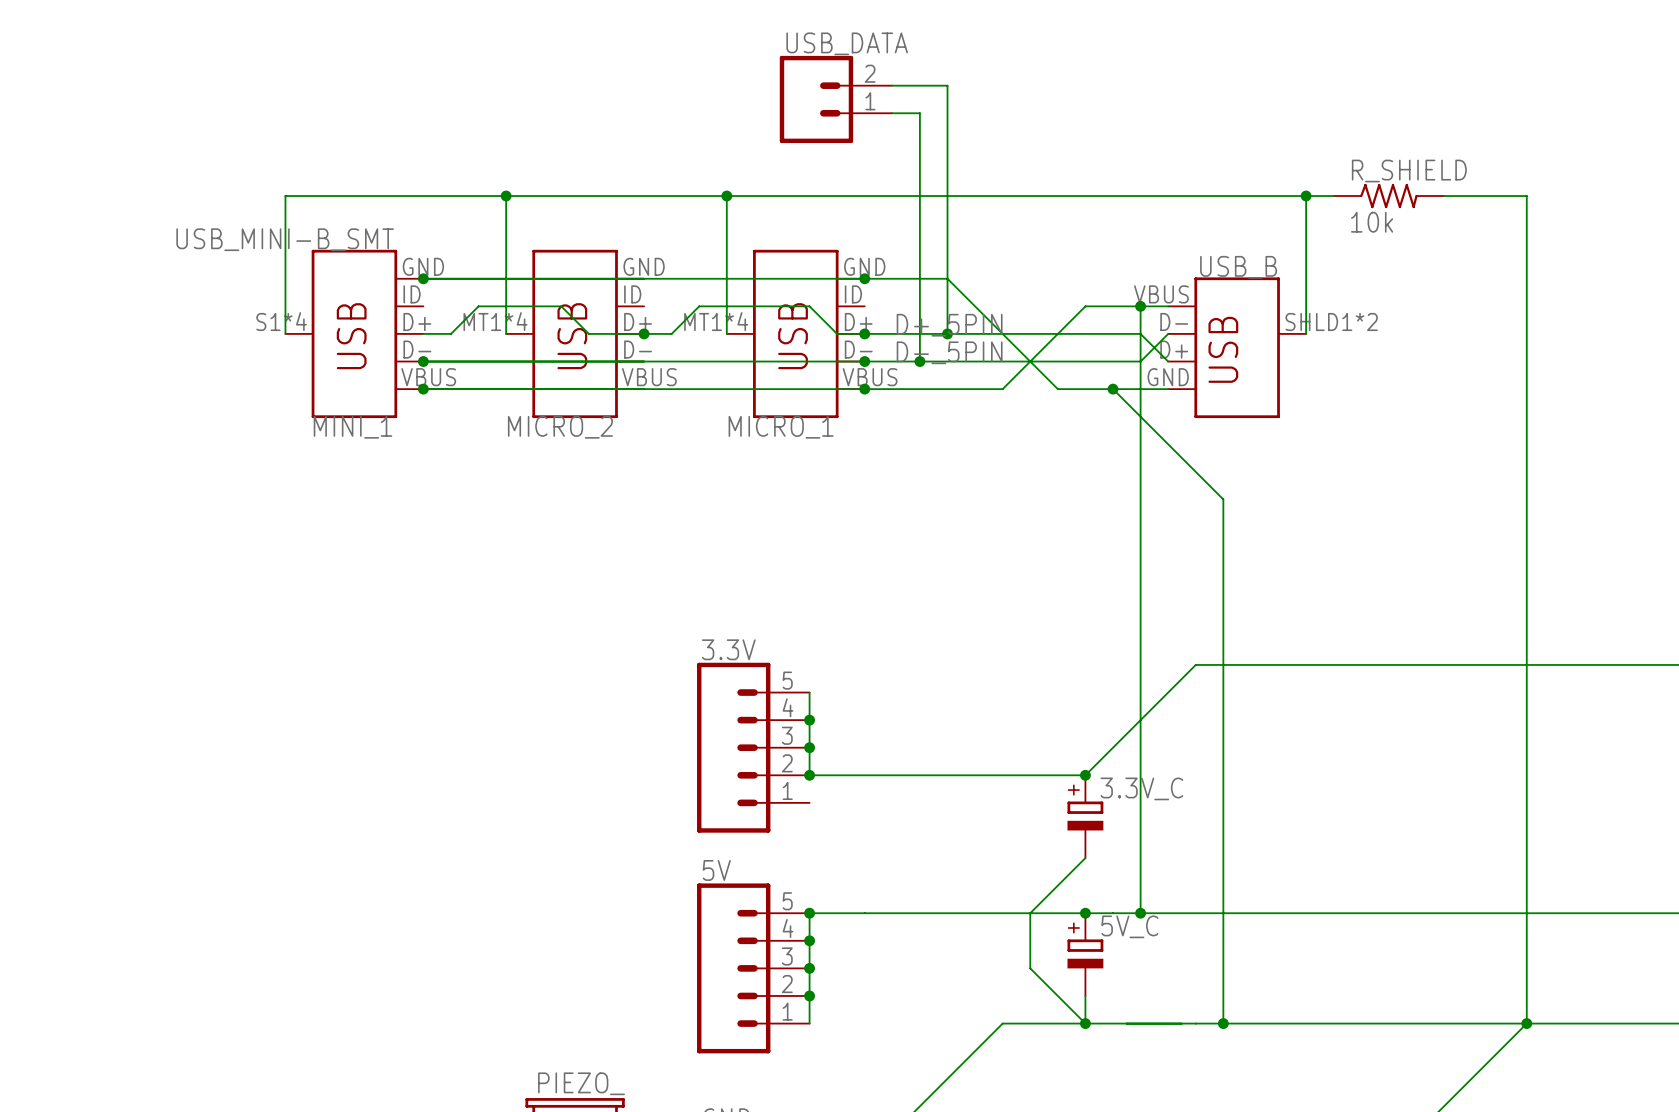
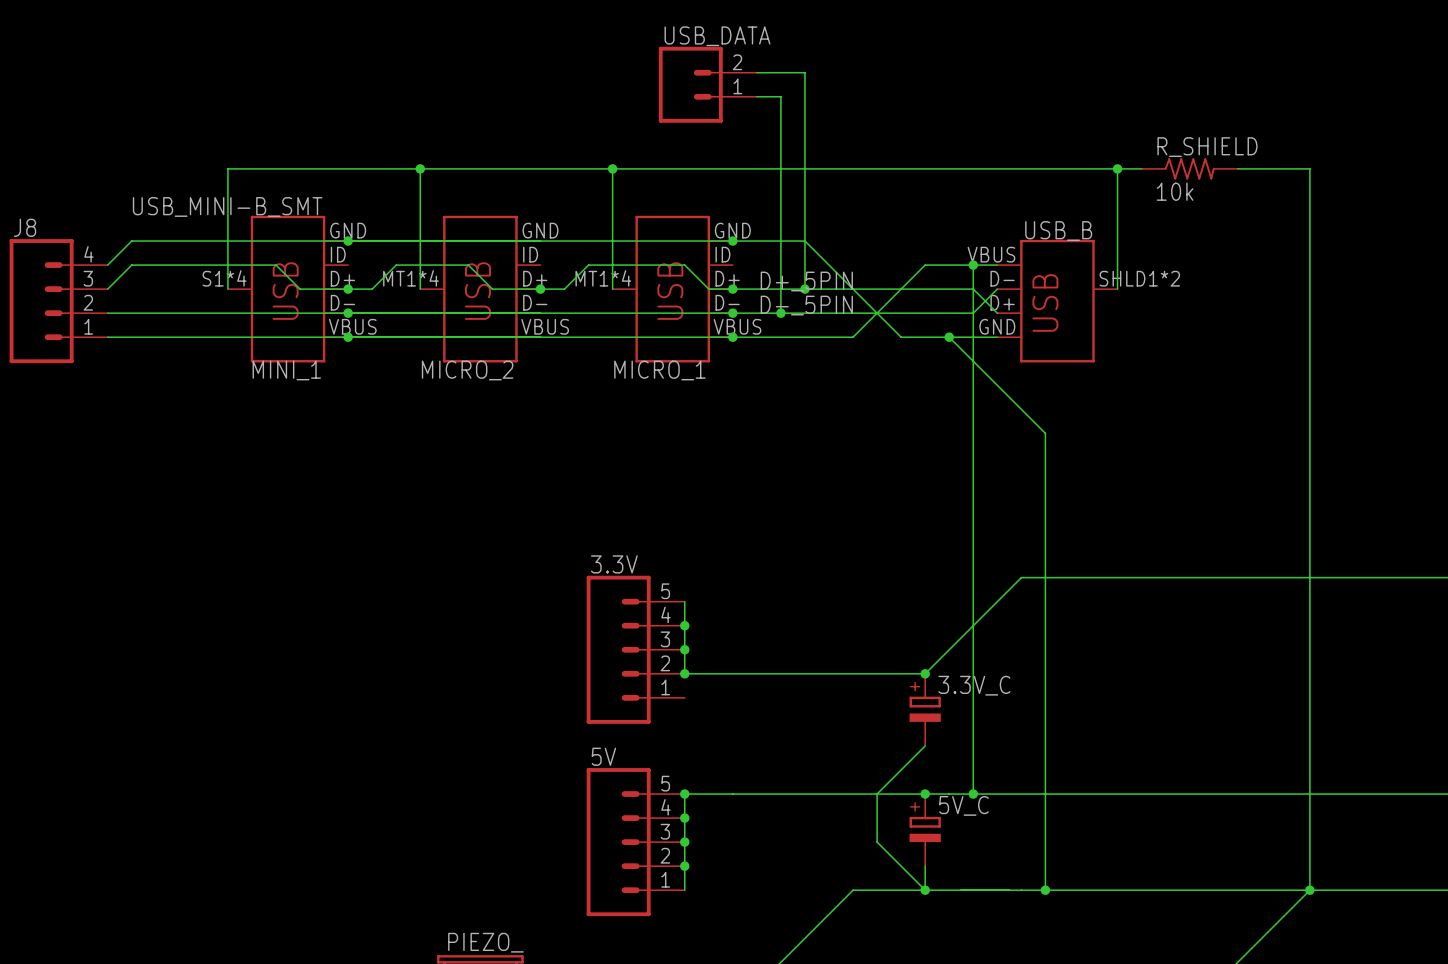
wire: none -> (348, 241) (131, 241) (107, 265)
wire: none -> (107, 289) (131, 265) (276, 265) (300, 289) (348, 289)
junction: none -> (348, 289)
J8: none -> (58, 301)
wire: none -> (107, 313) (348, 313)
wire: none -> (107, 337) (348, 337)

